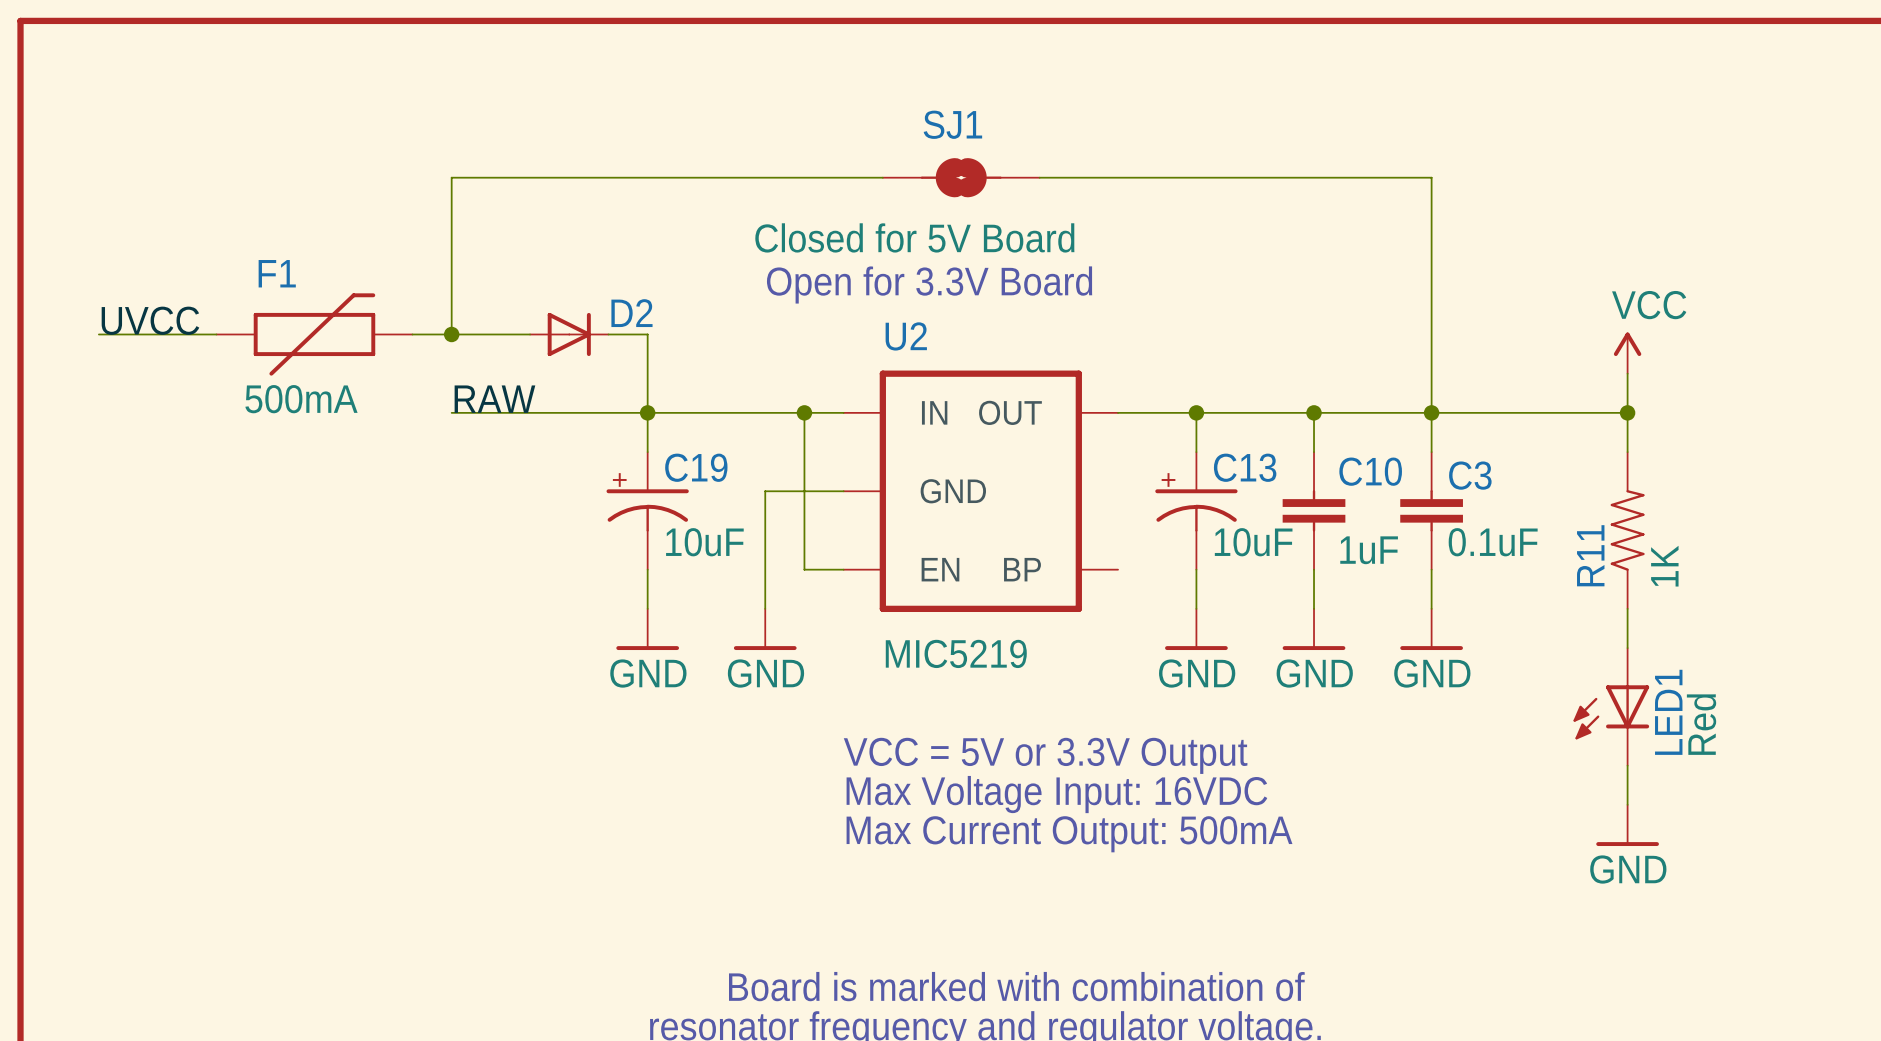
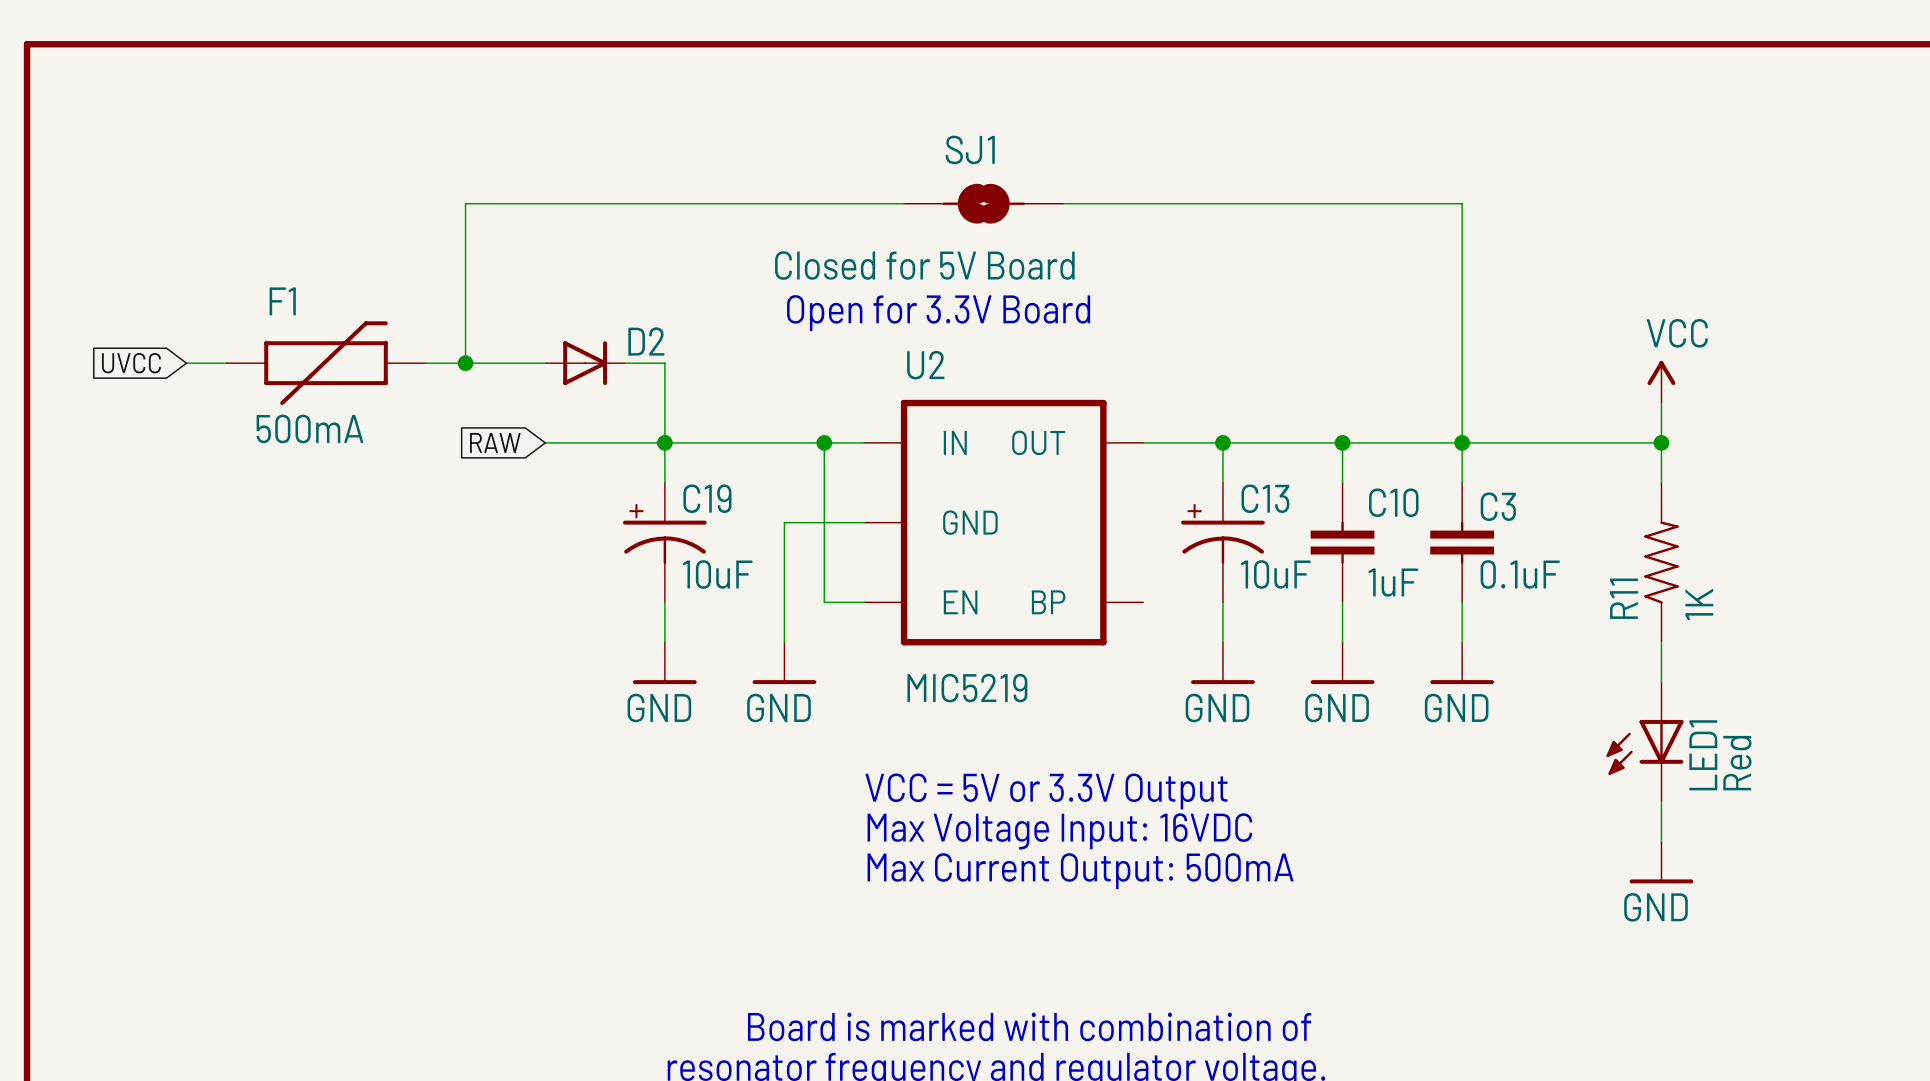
label: UVCC (150, 320) -> none
wire: (98, 334) (177, 334) -> none
global label: none -> UVCC (131, 363)
label: RAW (494, 399) -> none
wire: (451, 412) (530, 412) -> none
global label: none -> RAW (495, 442)

